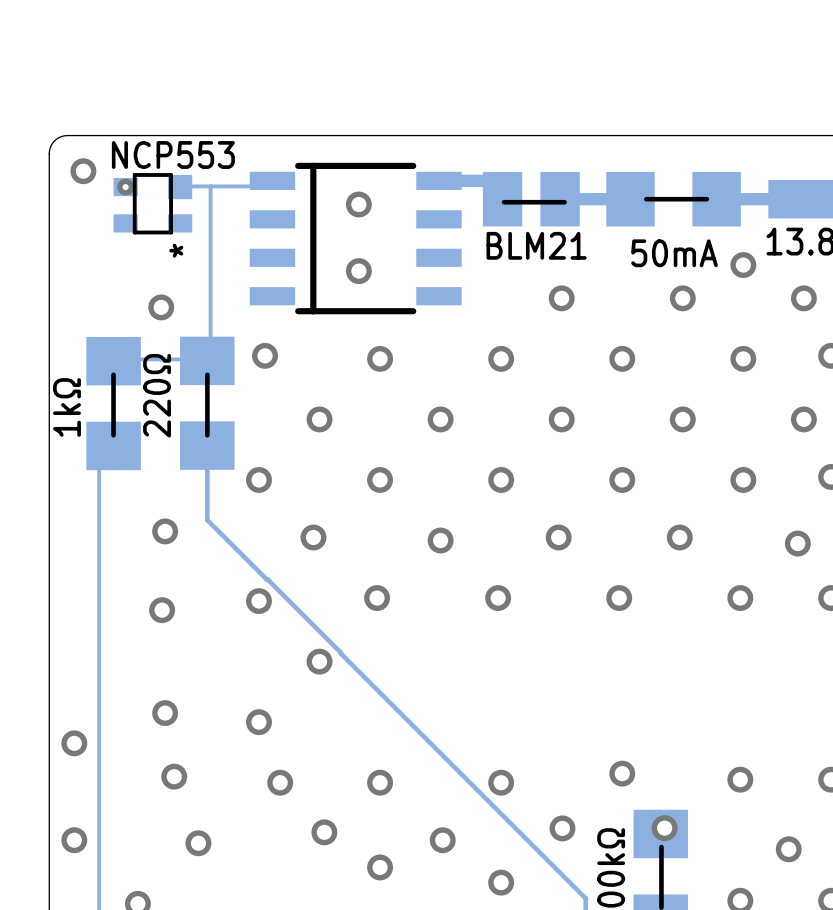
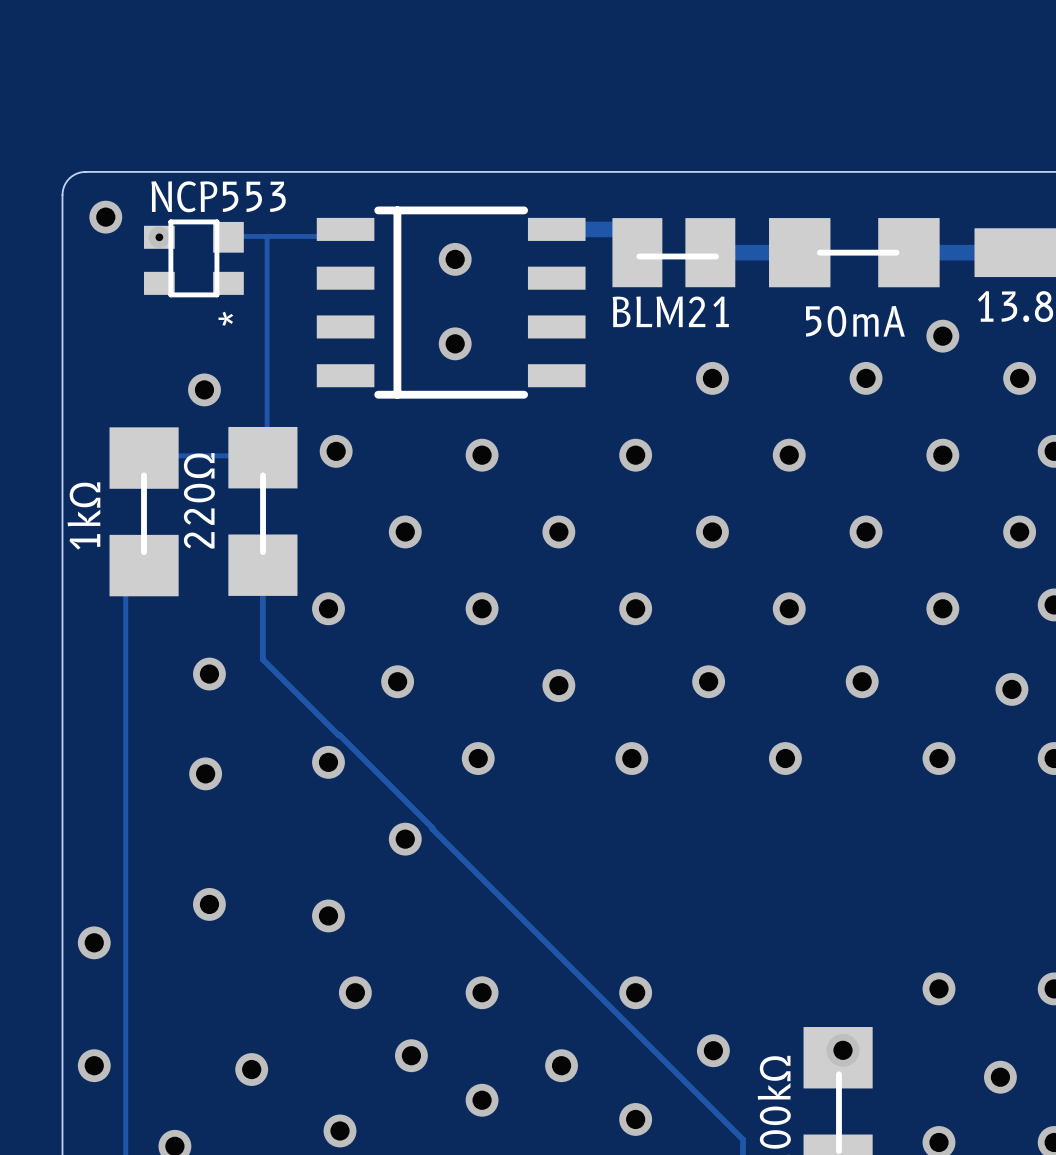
via: (622, 773) -> none
via: (174, 776) -> none
via: none -> (340, 1130)

